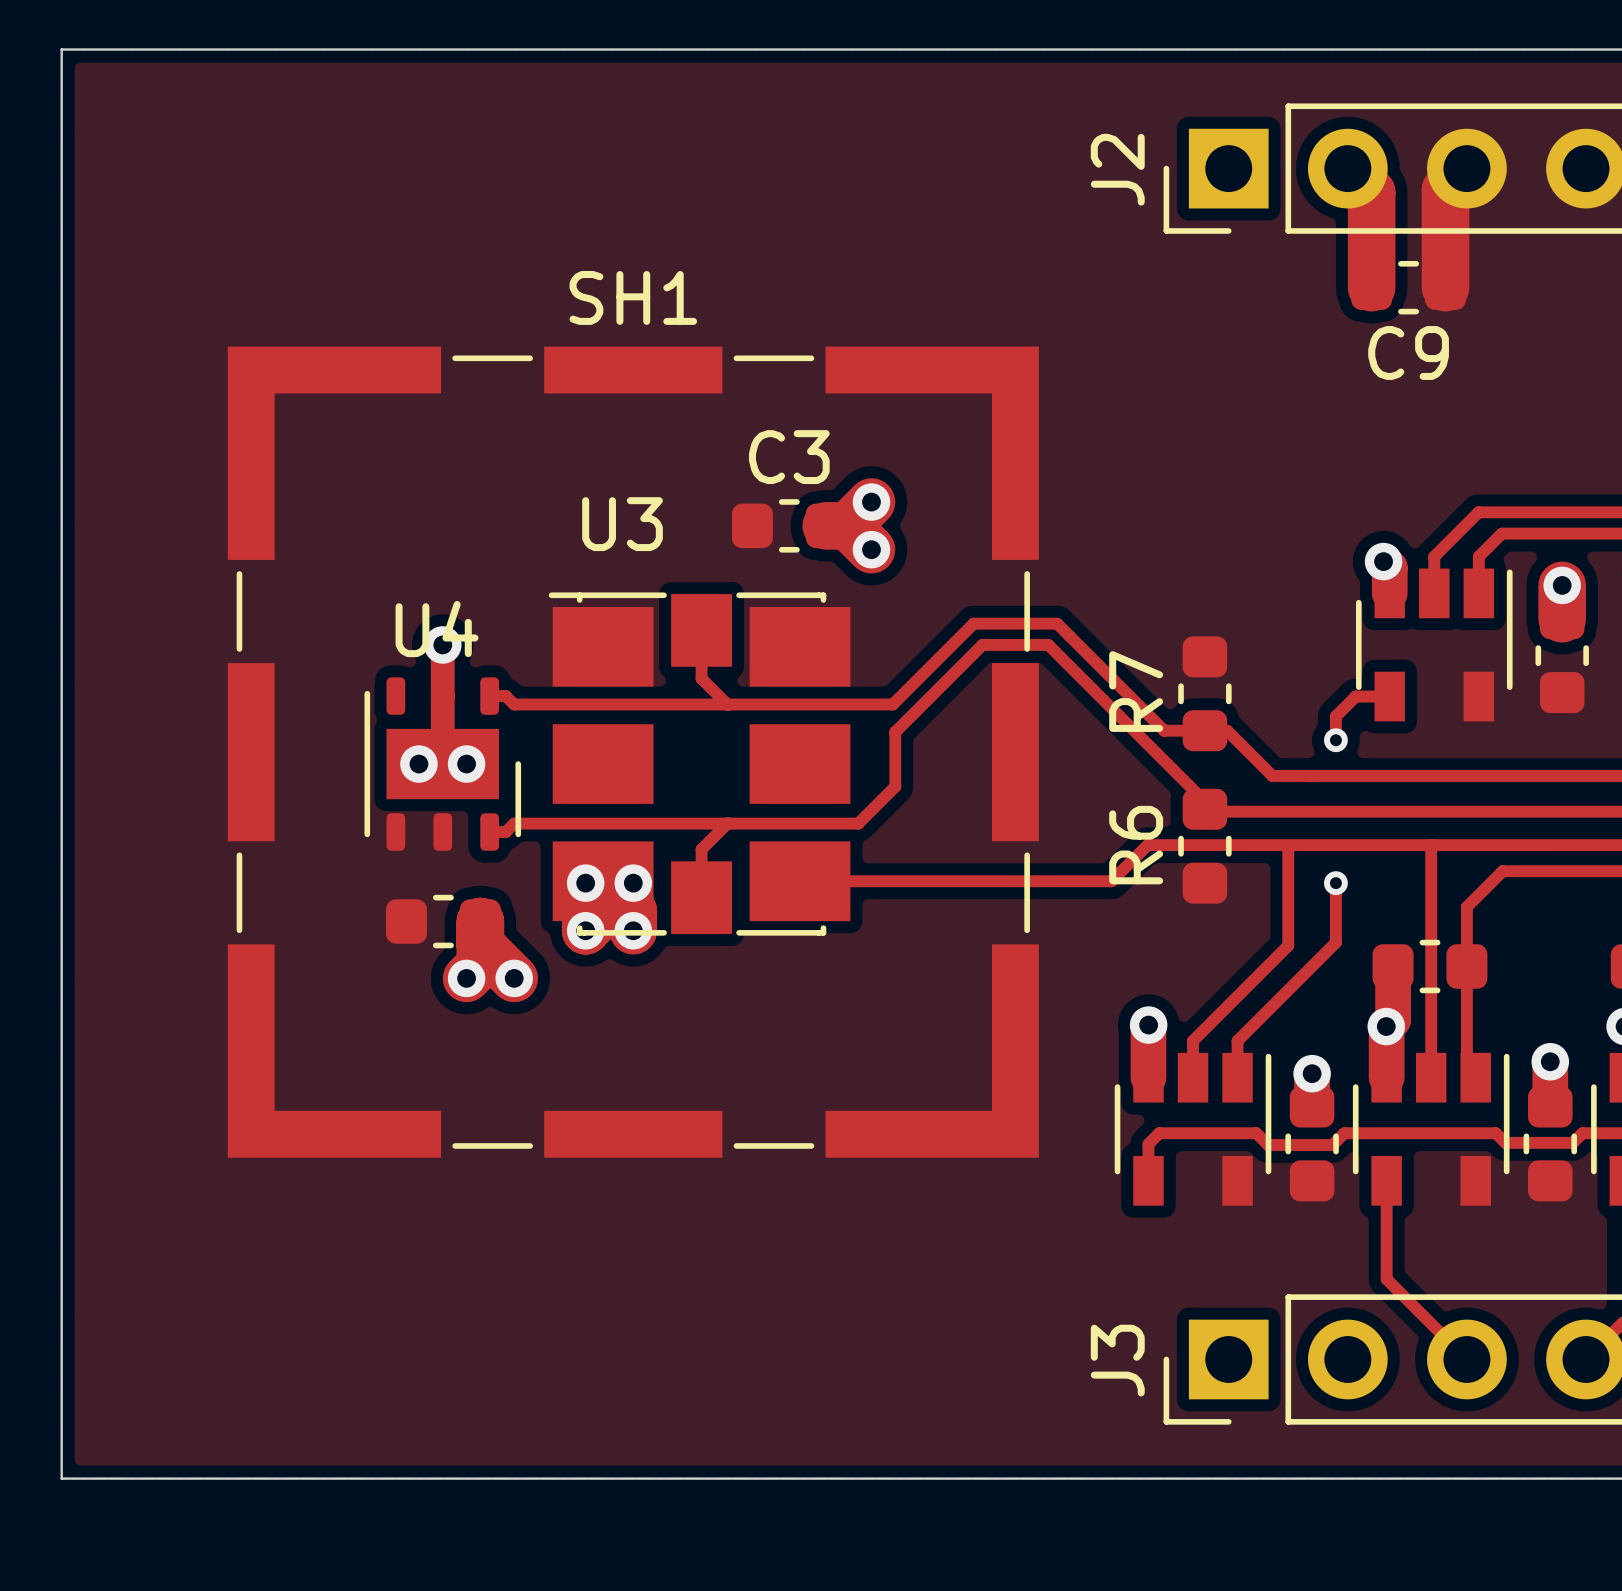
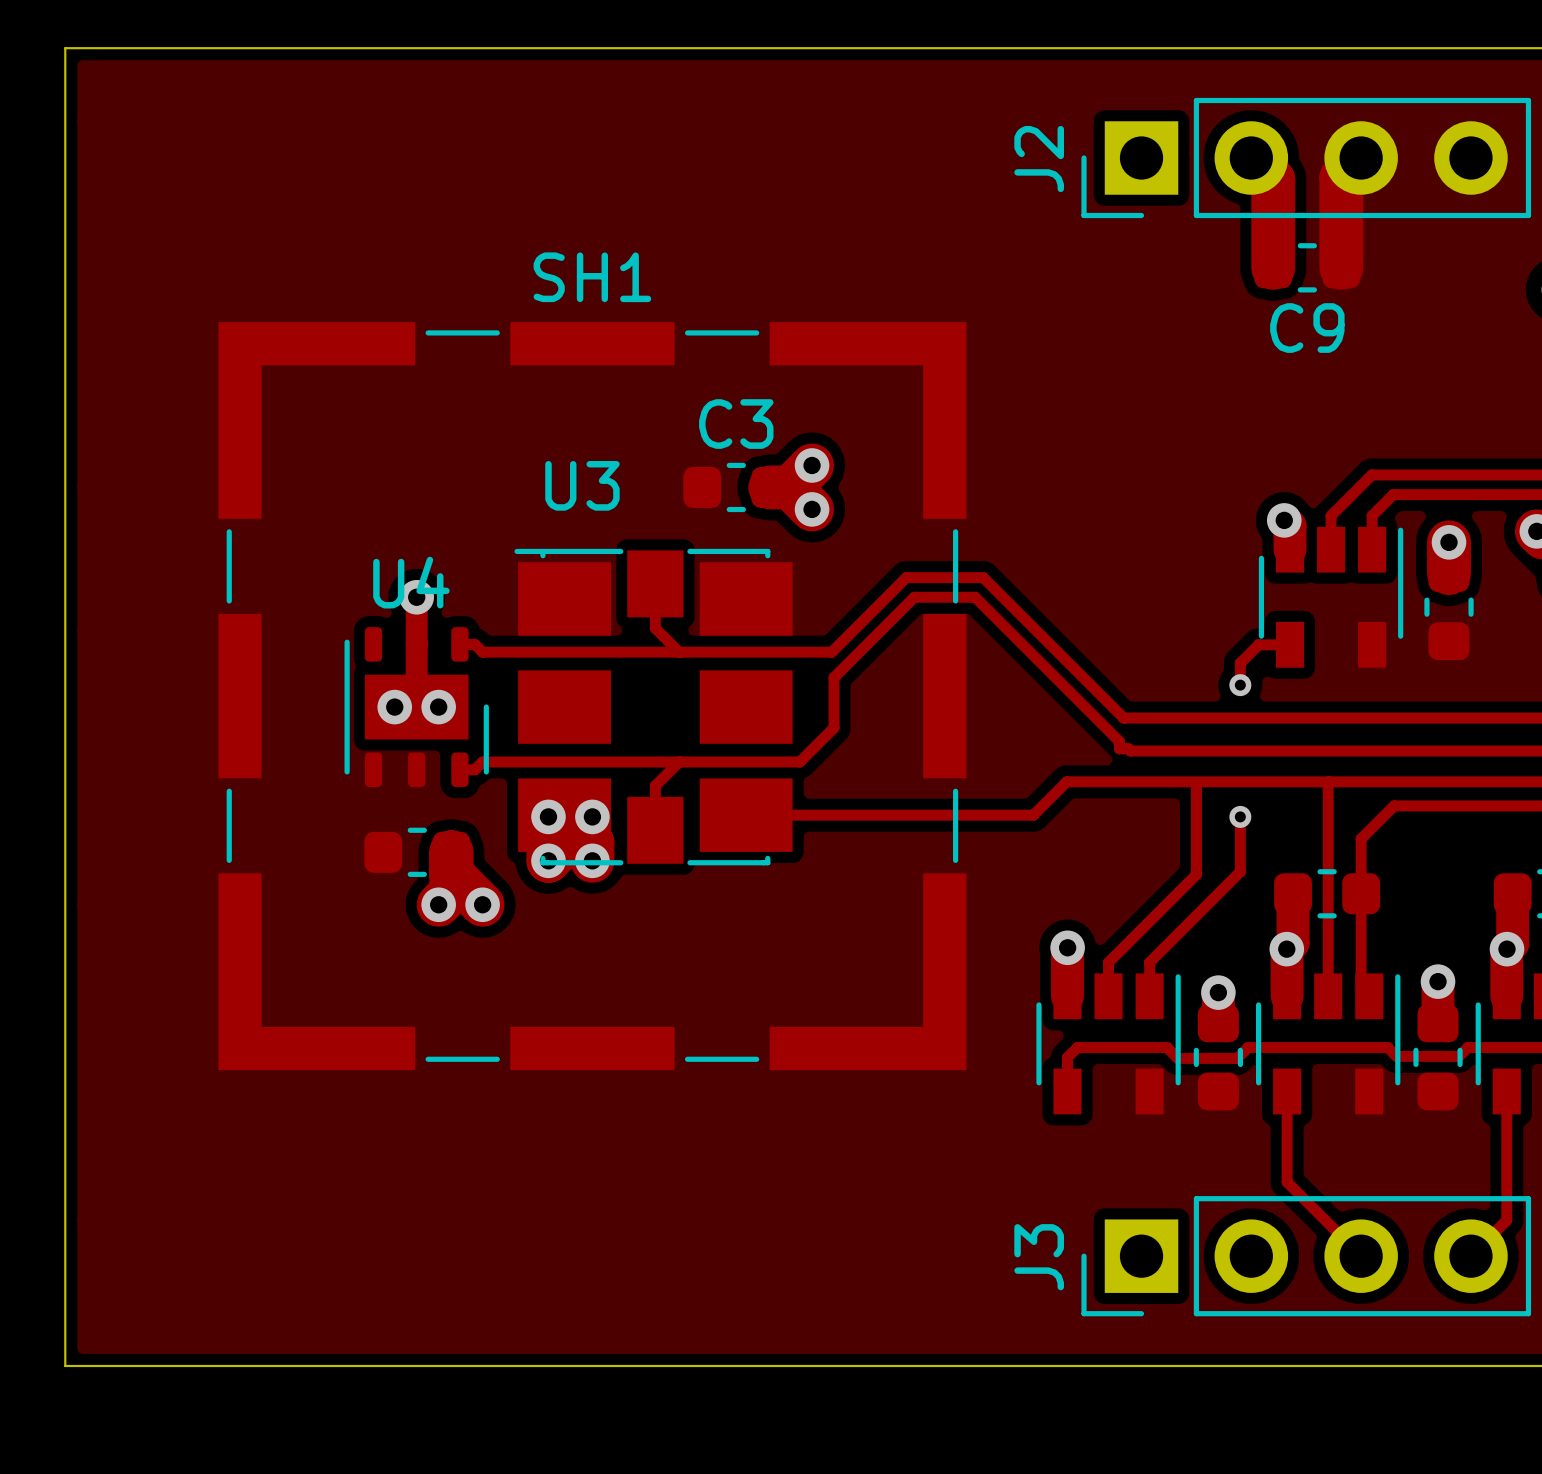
R7: (1204, 693) -> none
track: (1164, 730) (1227, 730) (1272, 775) -> (1082, 676) (1123, 718) (1181, 718)
R6: (1204, 846) -> none

